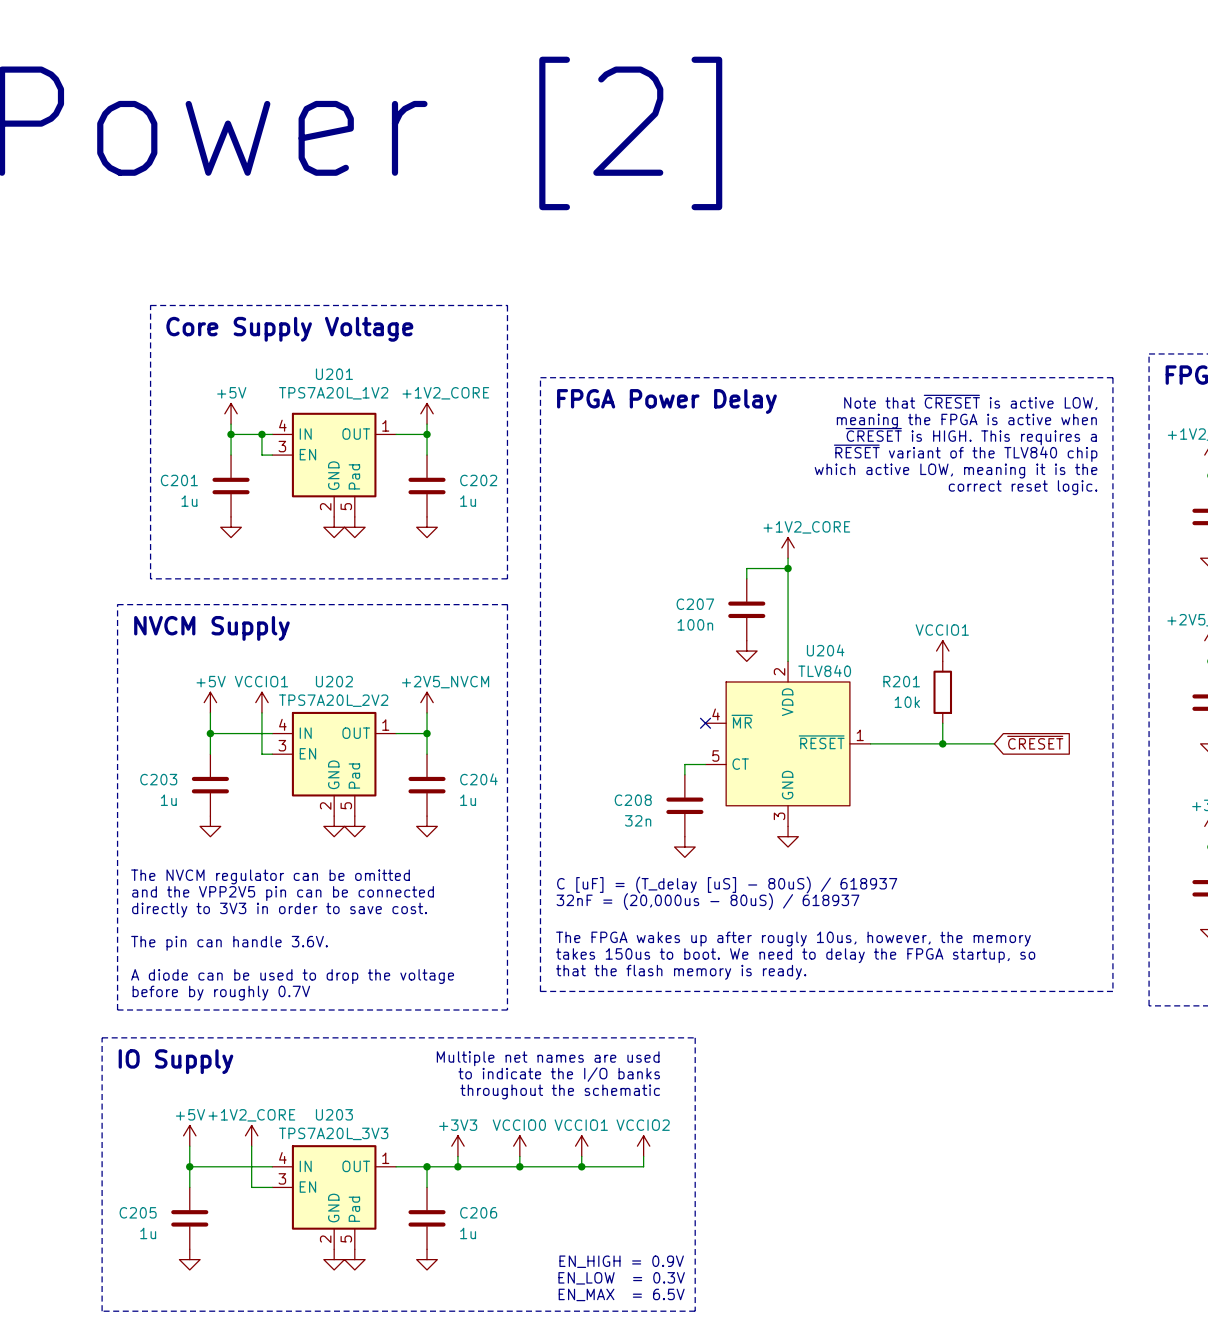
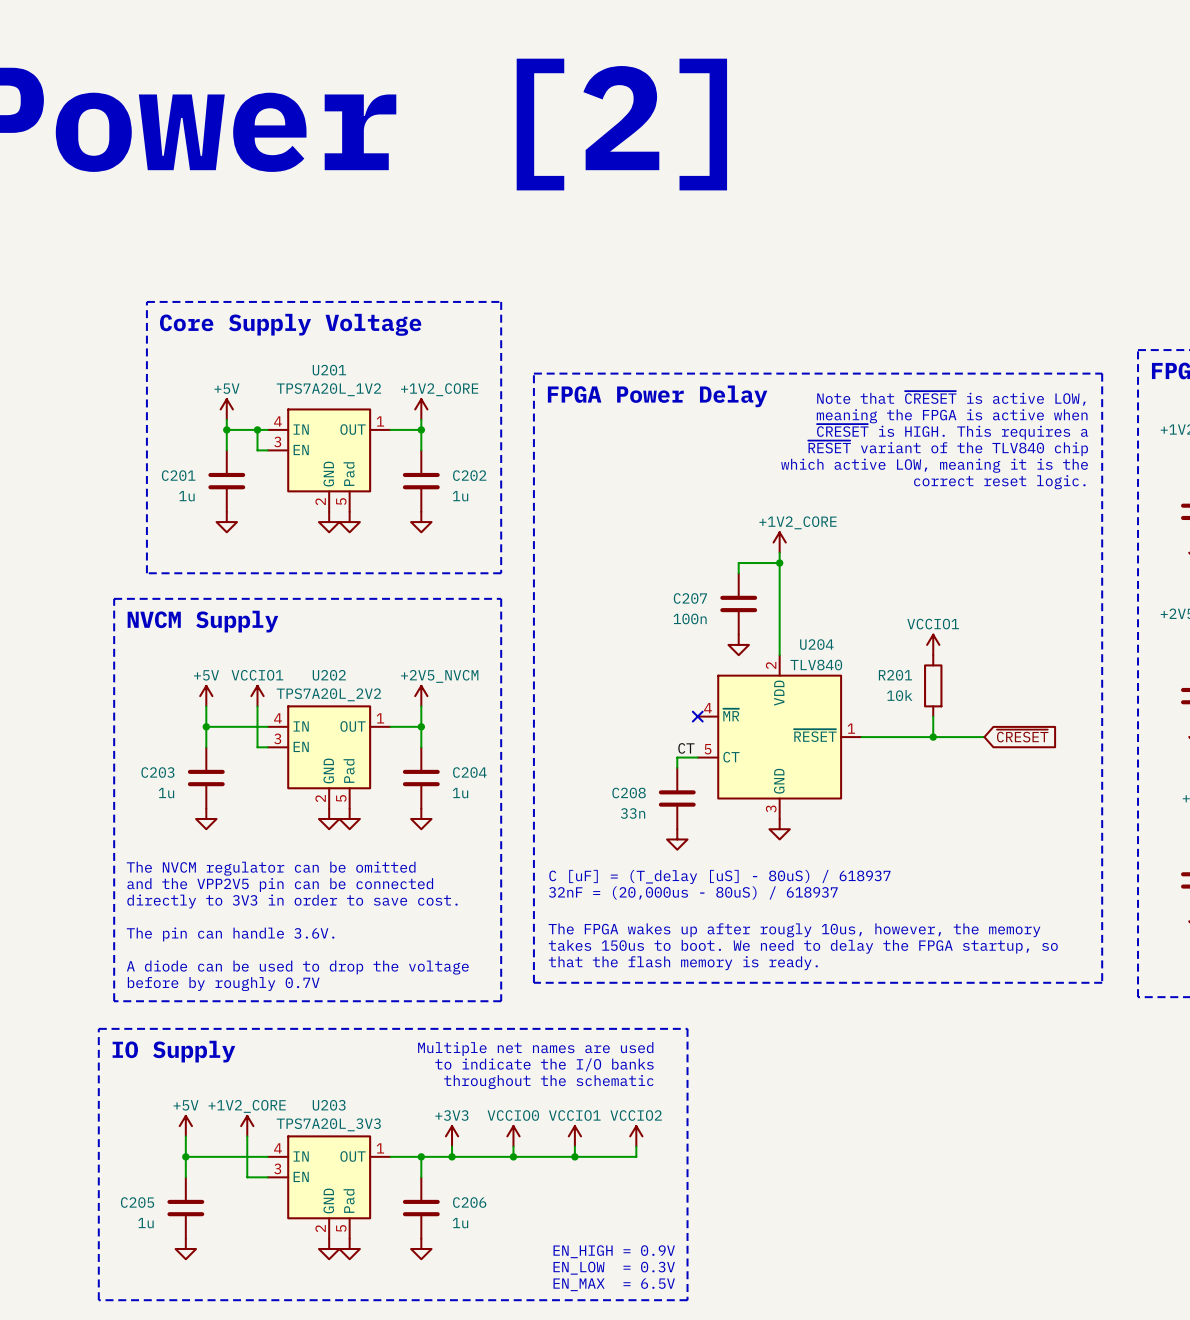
label: none -> CT (686, 748)
C208 value: 32n (638, 820) -> 33n (633, 813)

